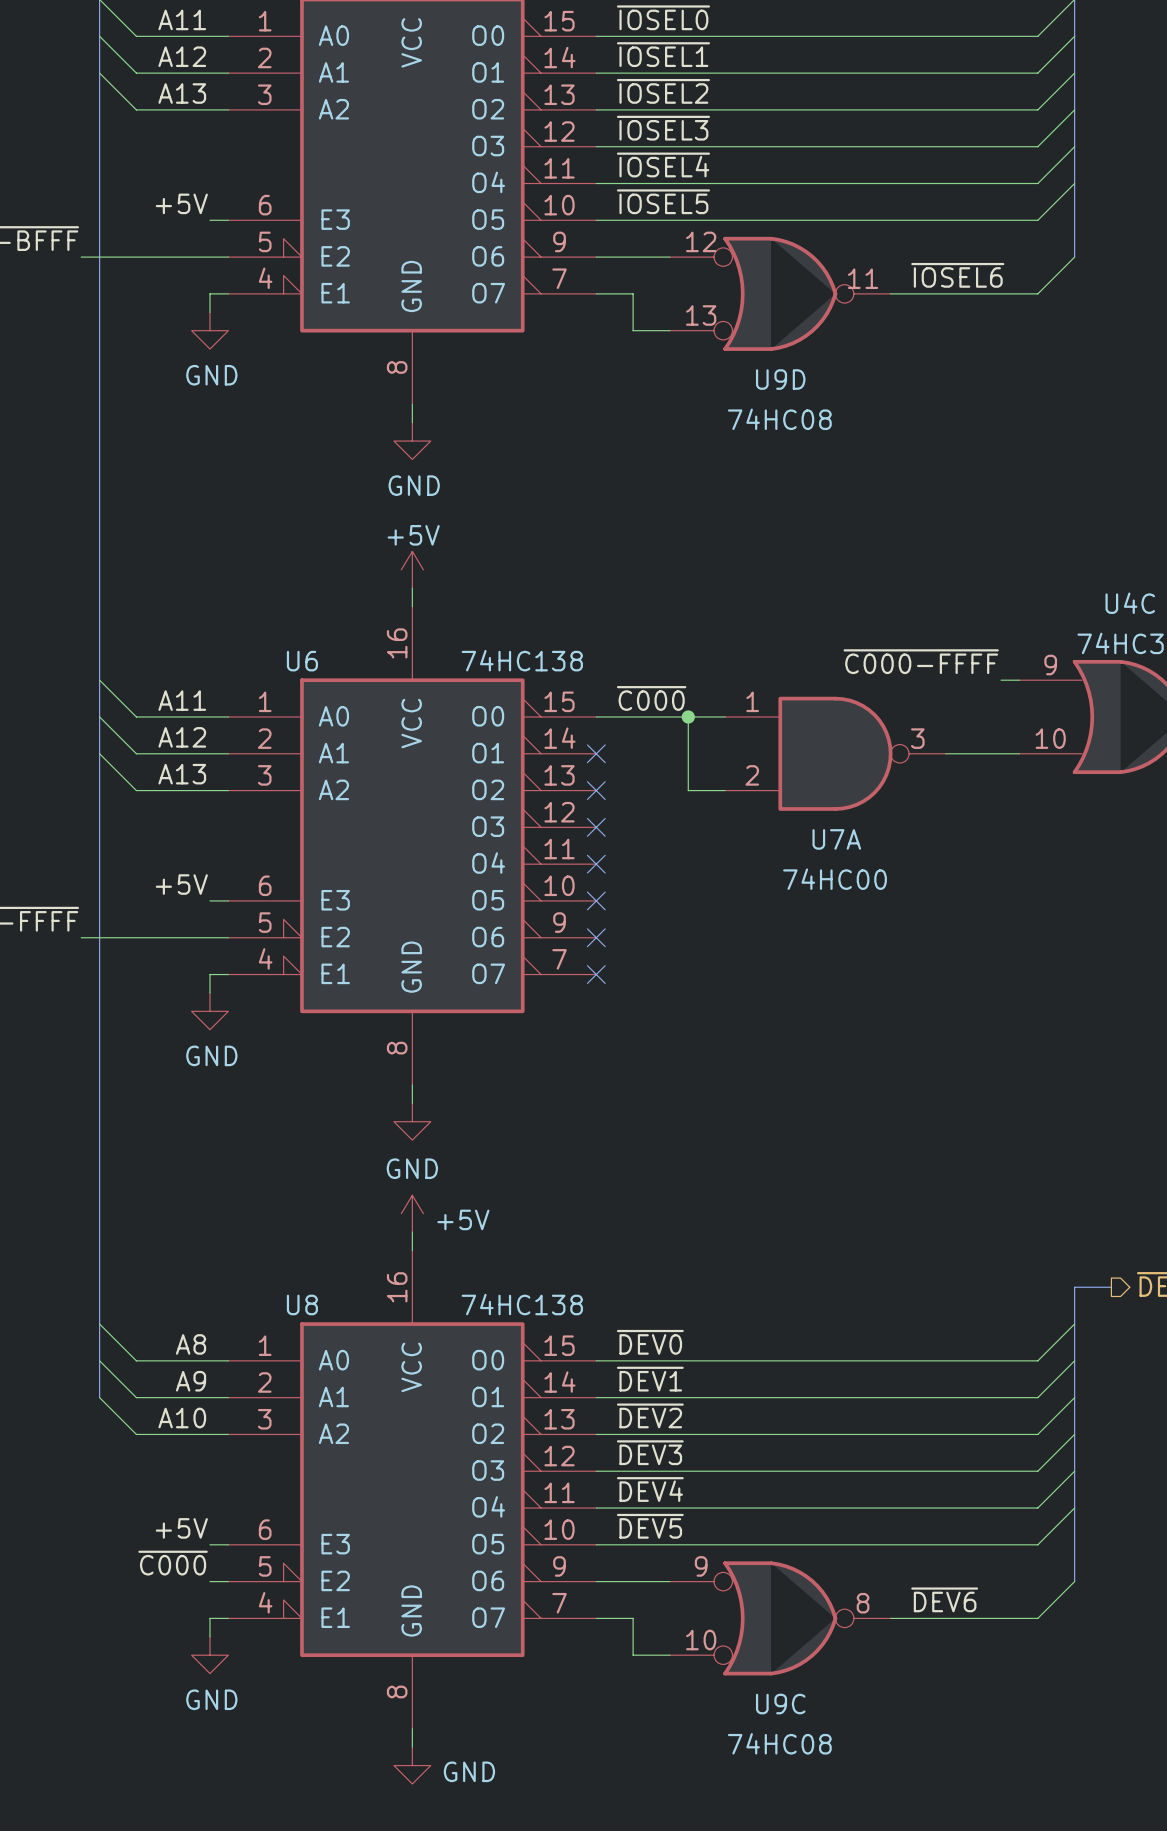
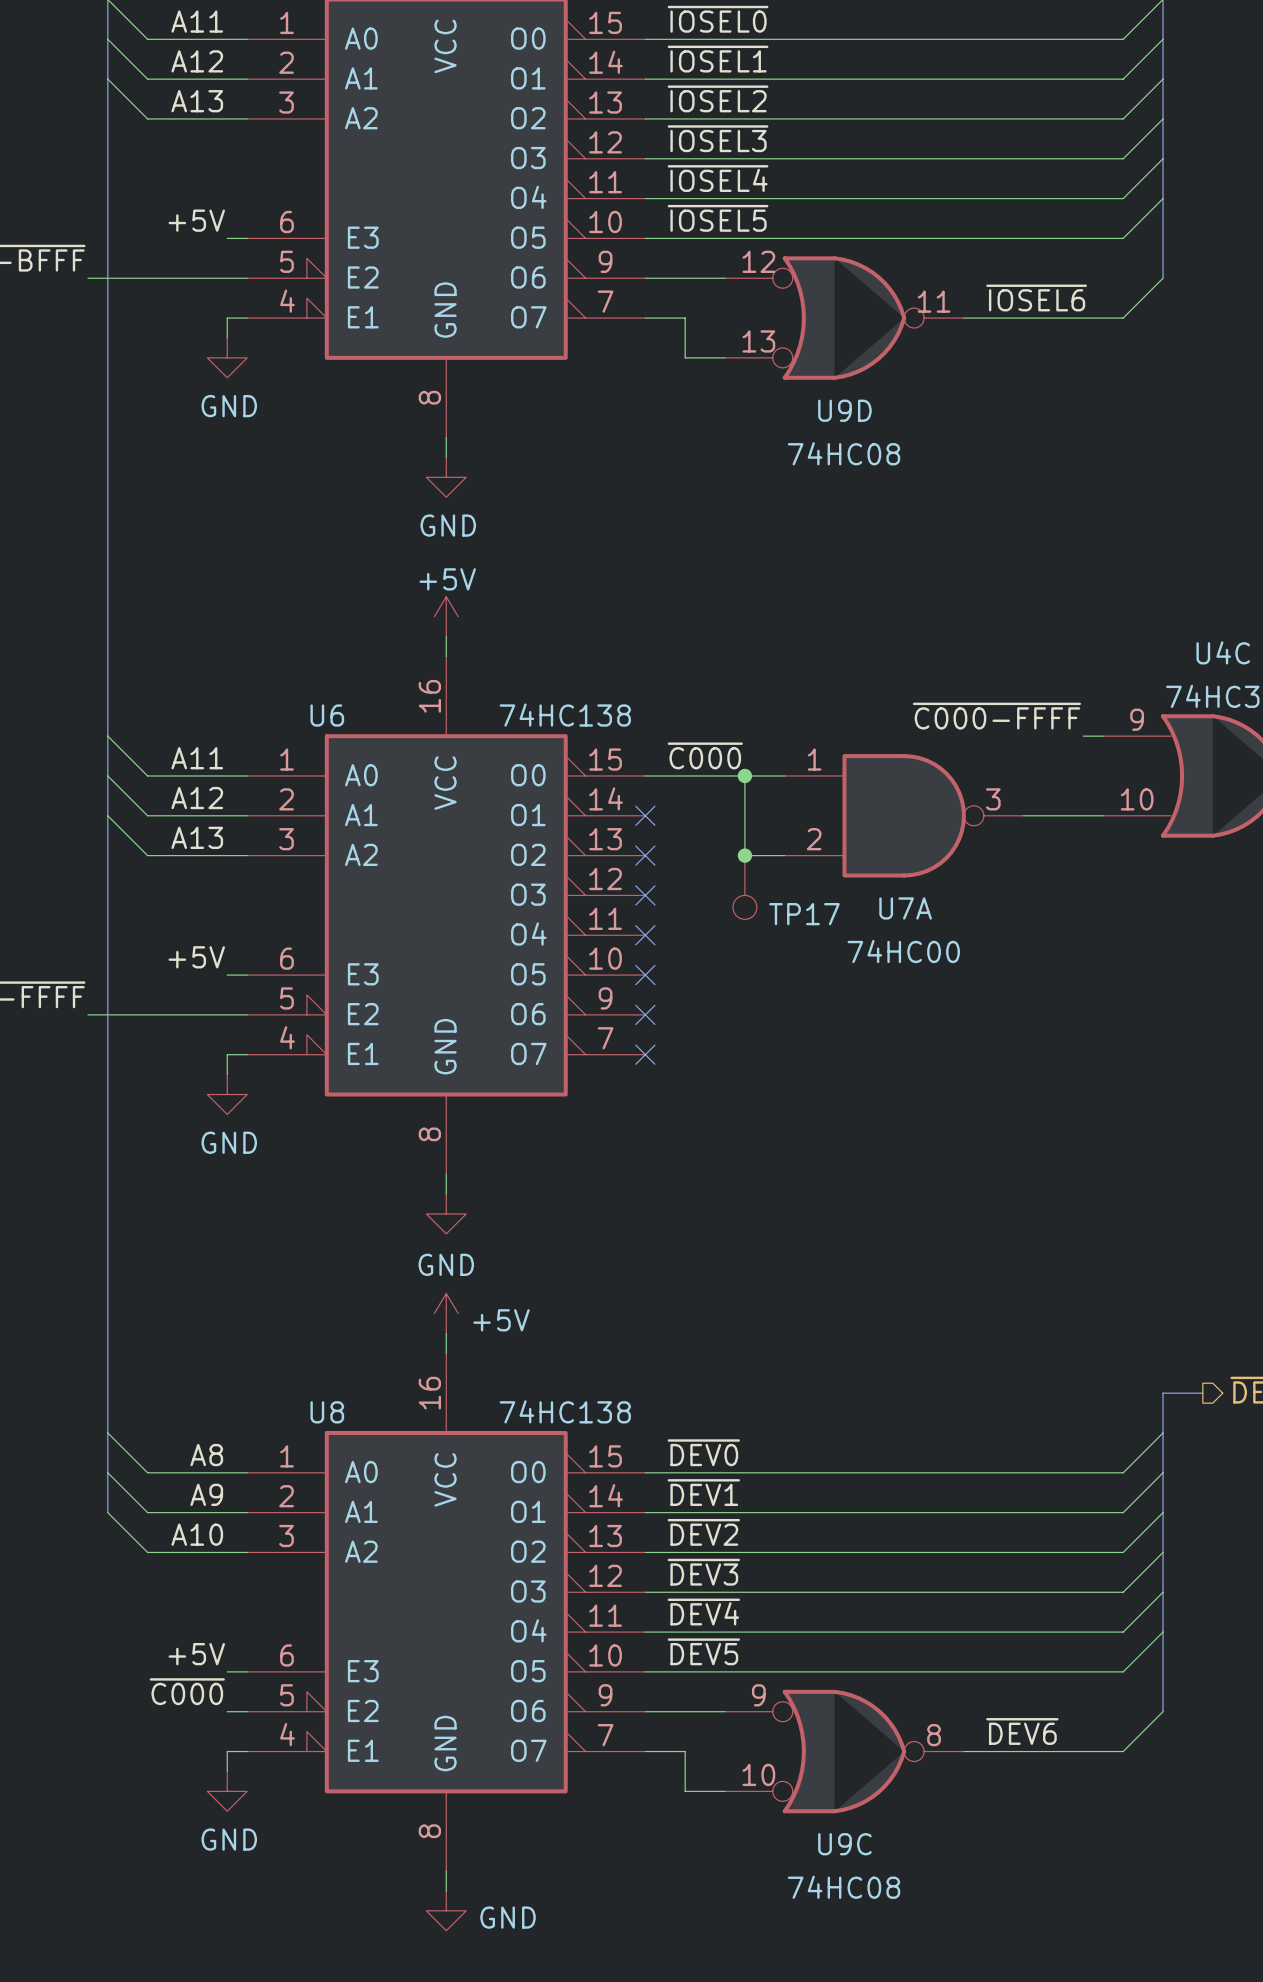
junction: none -> (744, 855)
TP17: none -> (744, 887)

